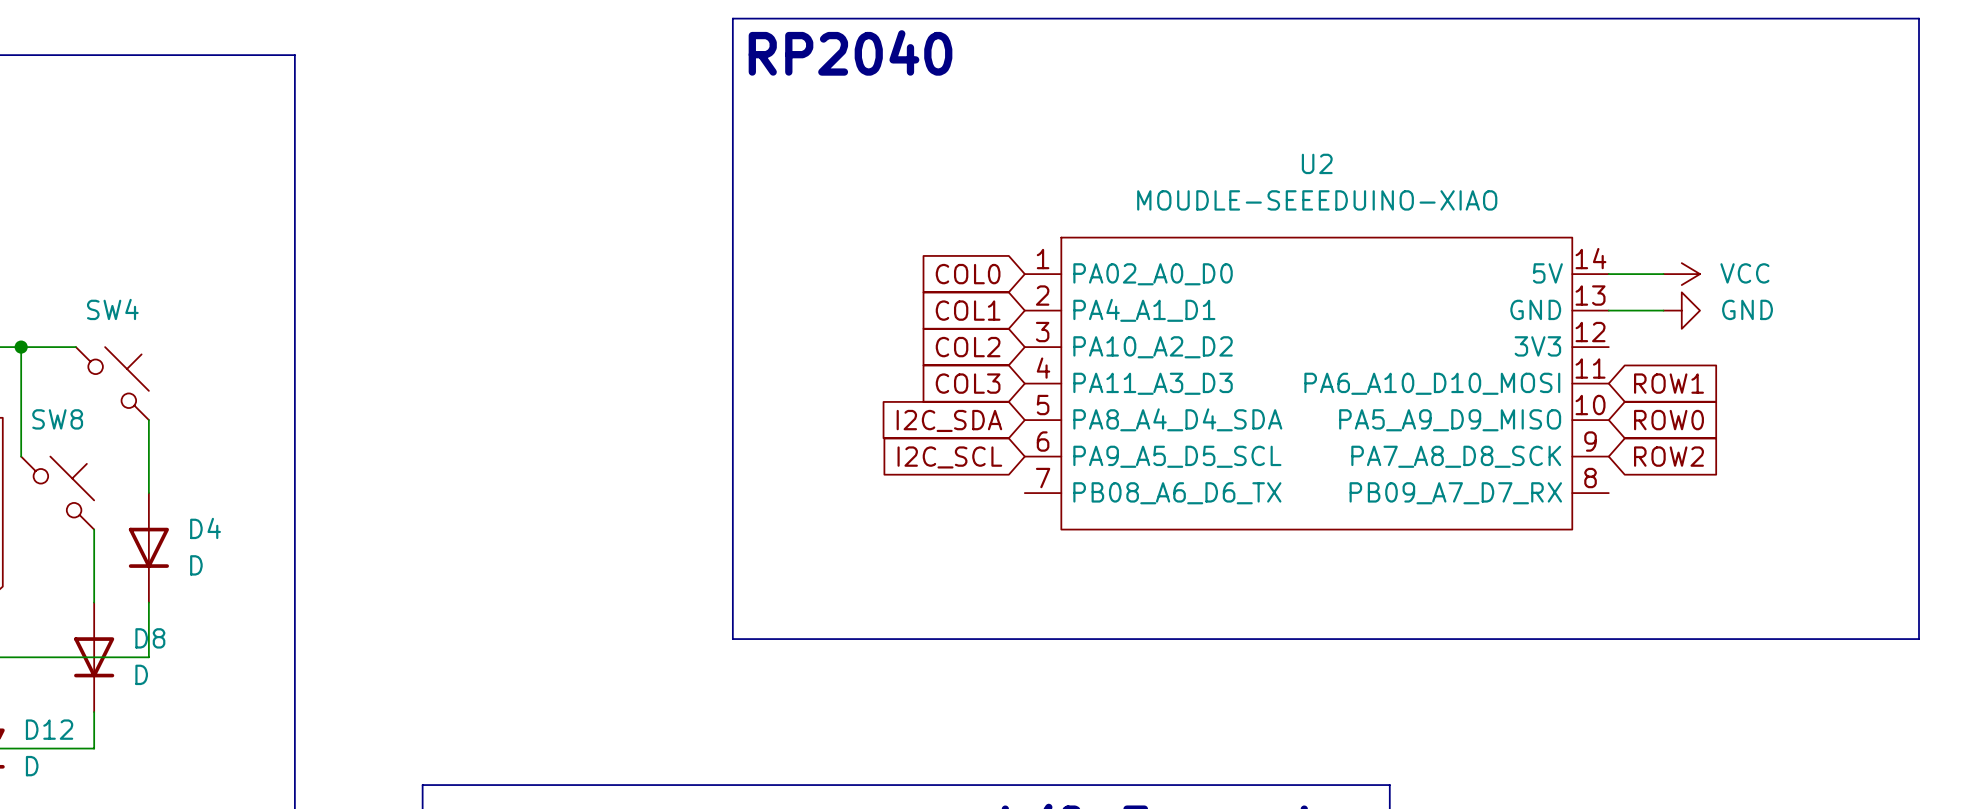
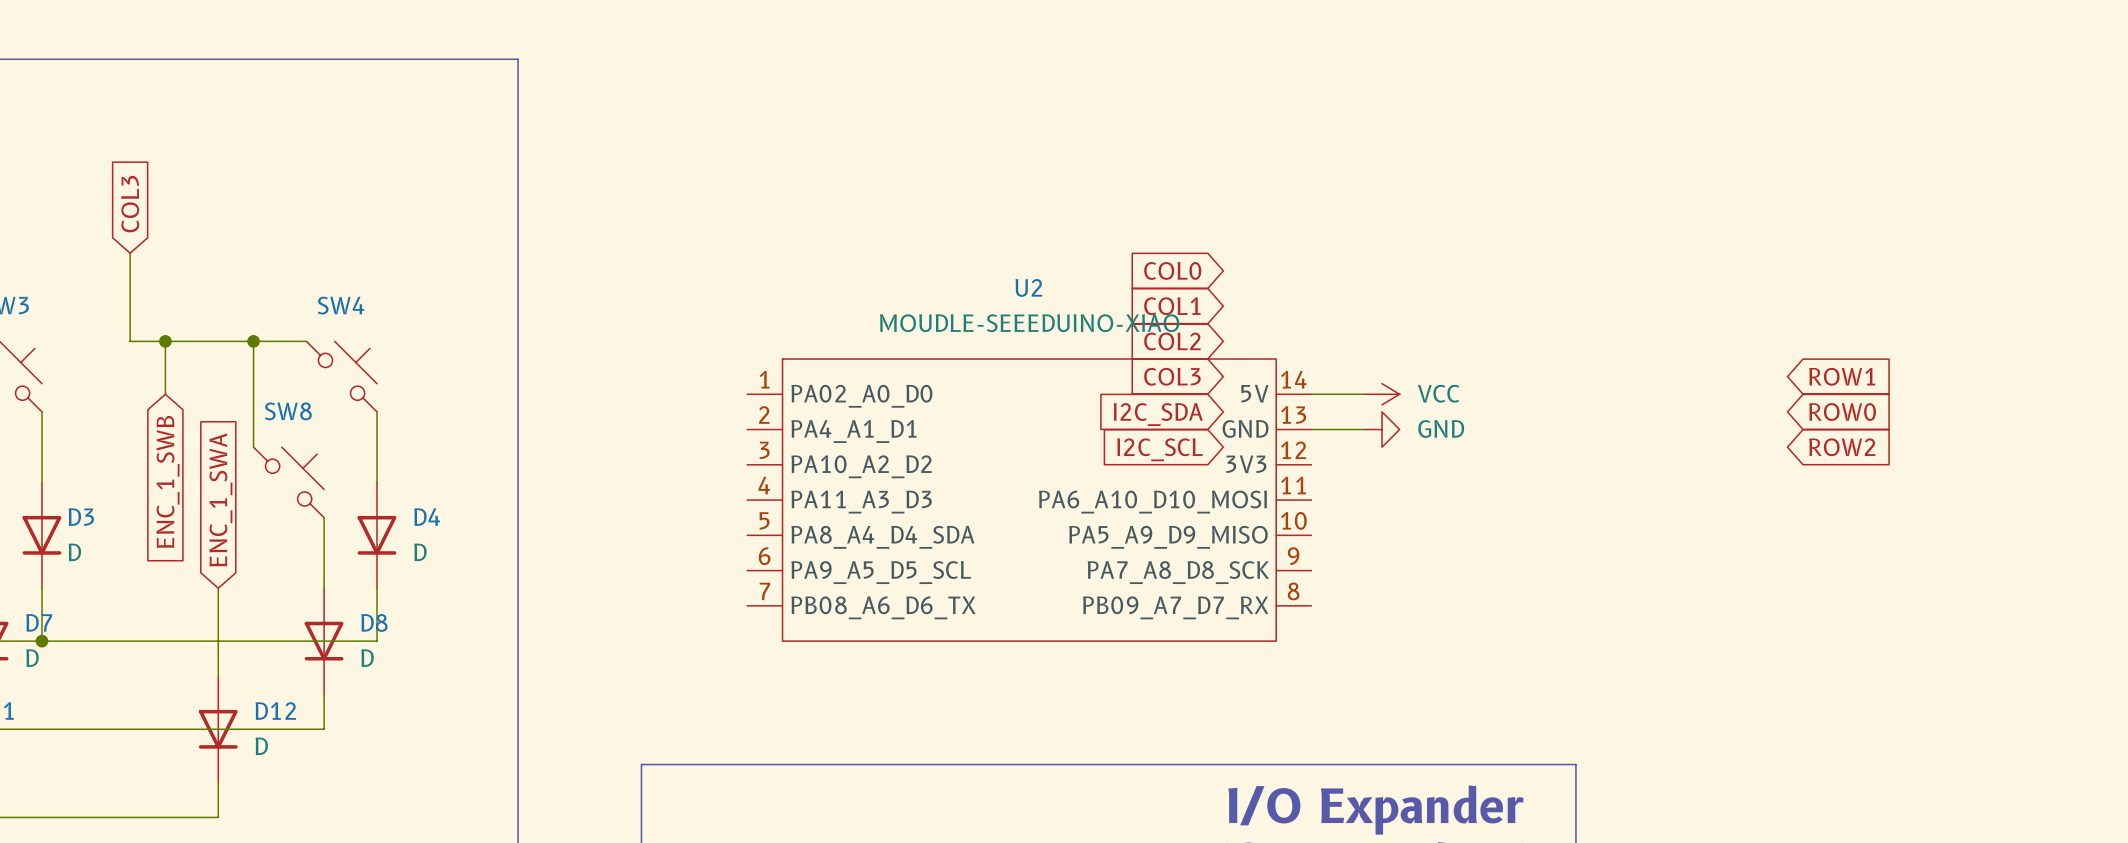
line: (732, 18) (1919, 18) (1919, 639) (732, 639) (732, 18) -> none
text: RP2040 (850, 52) -> none
wire: (1608, 274) (1663, 274) -> none
power symbol: VCC (1681, 274) -> none
wire: (1608, 310) (1663, 310) -> none
power symbol: GND (1681, 310) -> none
U2 position: (1316, 383) -> (1029, 500)
wire: none -> (1311, 394) (1364, 394)
power symbol: none -> VCC (1382, 394)
wire: none -> (1311, 429) (1364, 429)
power symbol: none -> GND (1382, 429)

